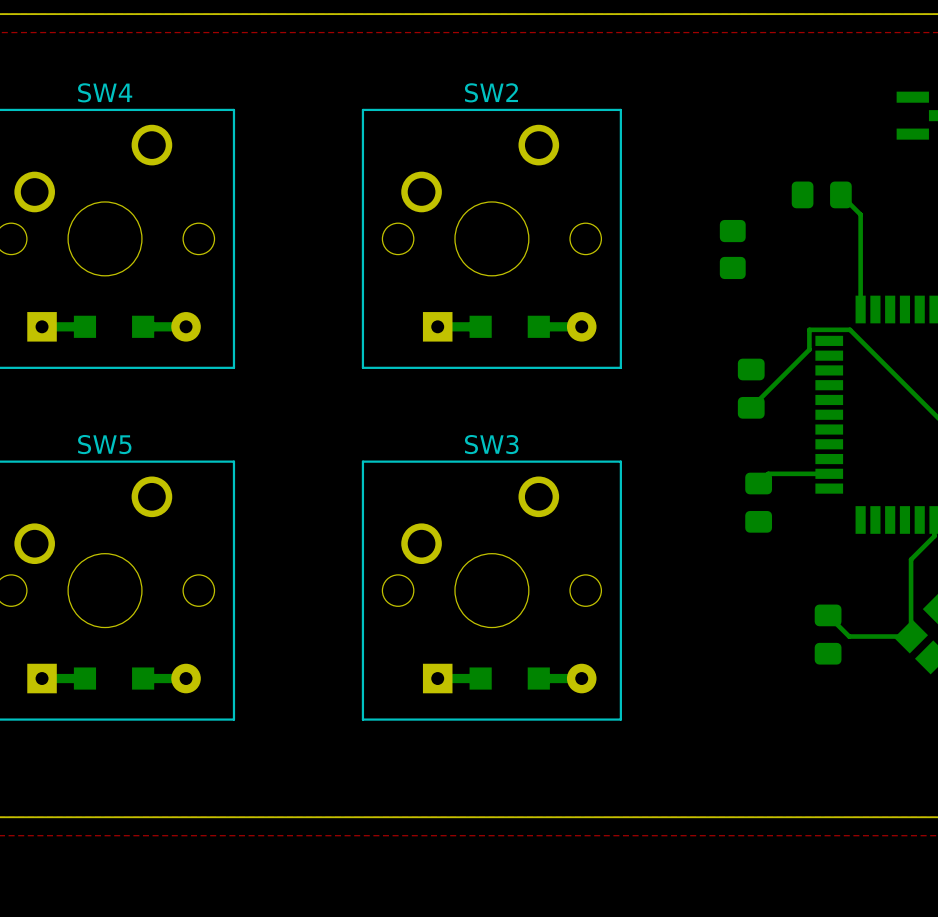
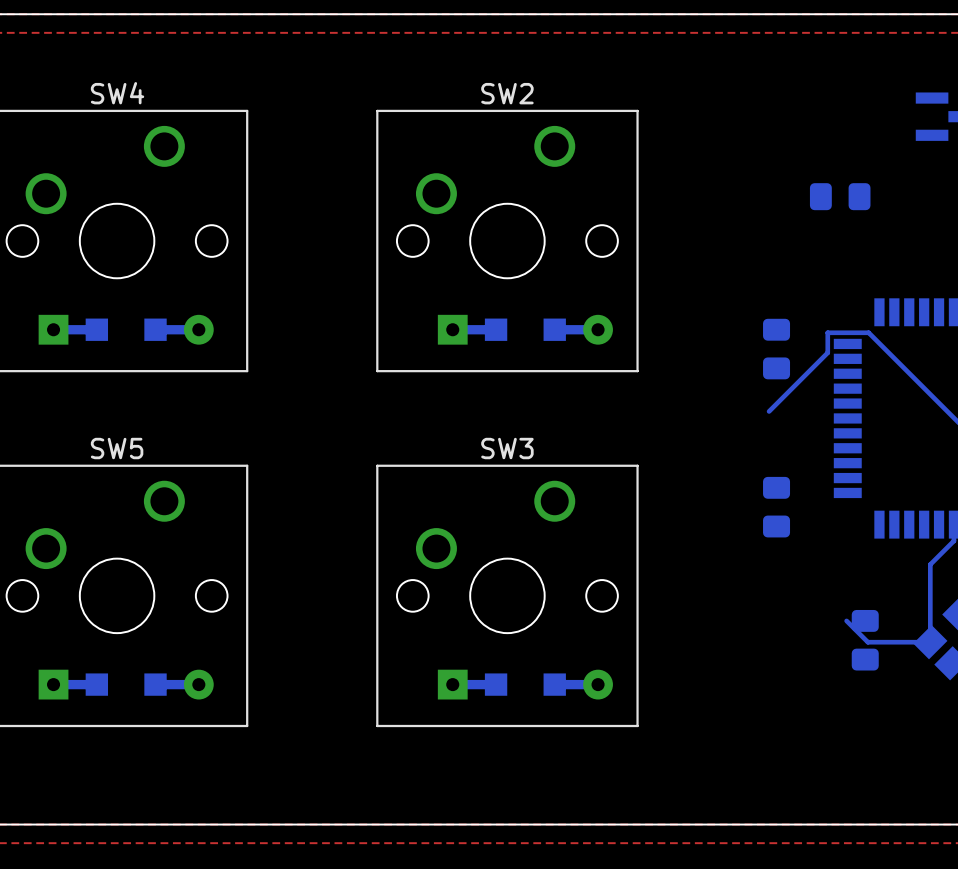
bottom track: (840, 194) (860, 214) (860, 309) -> none
part: (732, 249) -> none
part position: (751, 388) -> (776, 349)
bottom track: (829, 473) (768, 473) (758, 483) -> none
part position: (828, 634) -> (865, 640)

